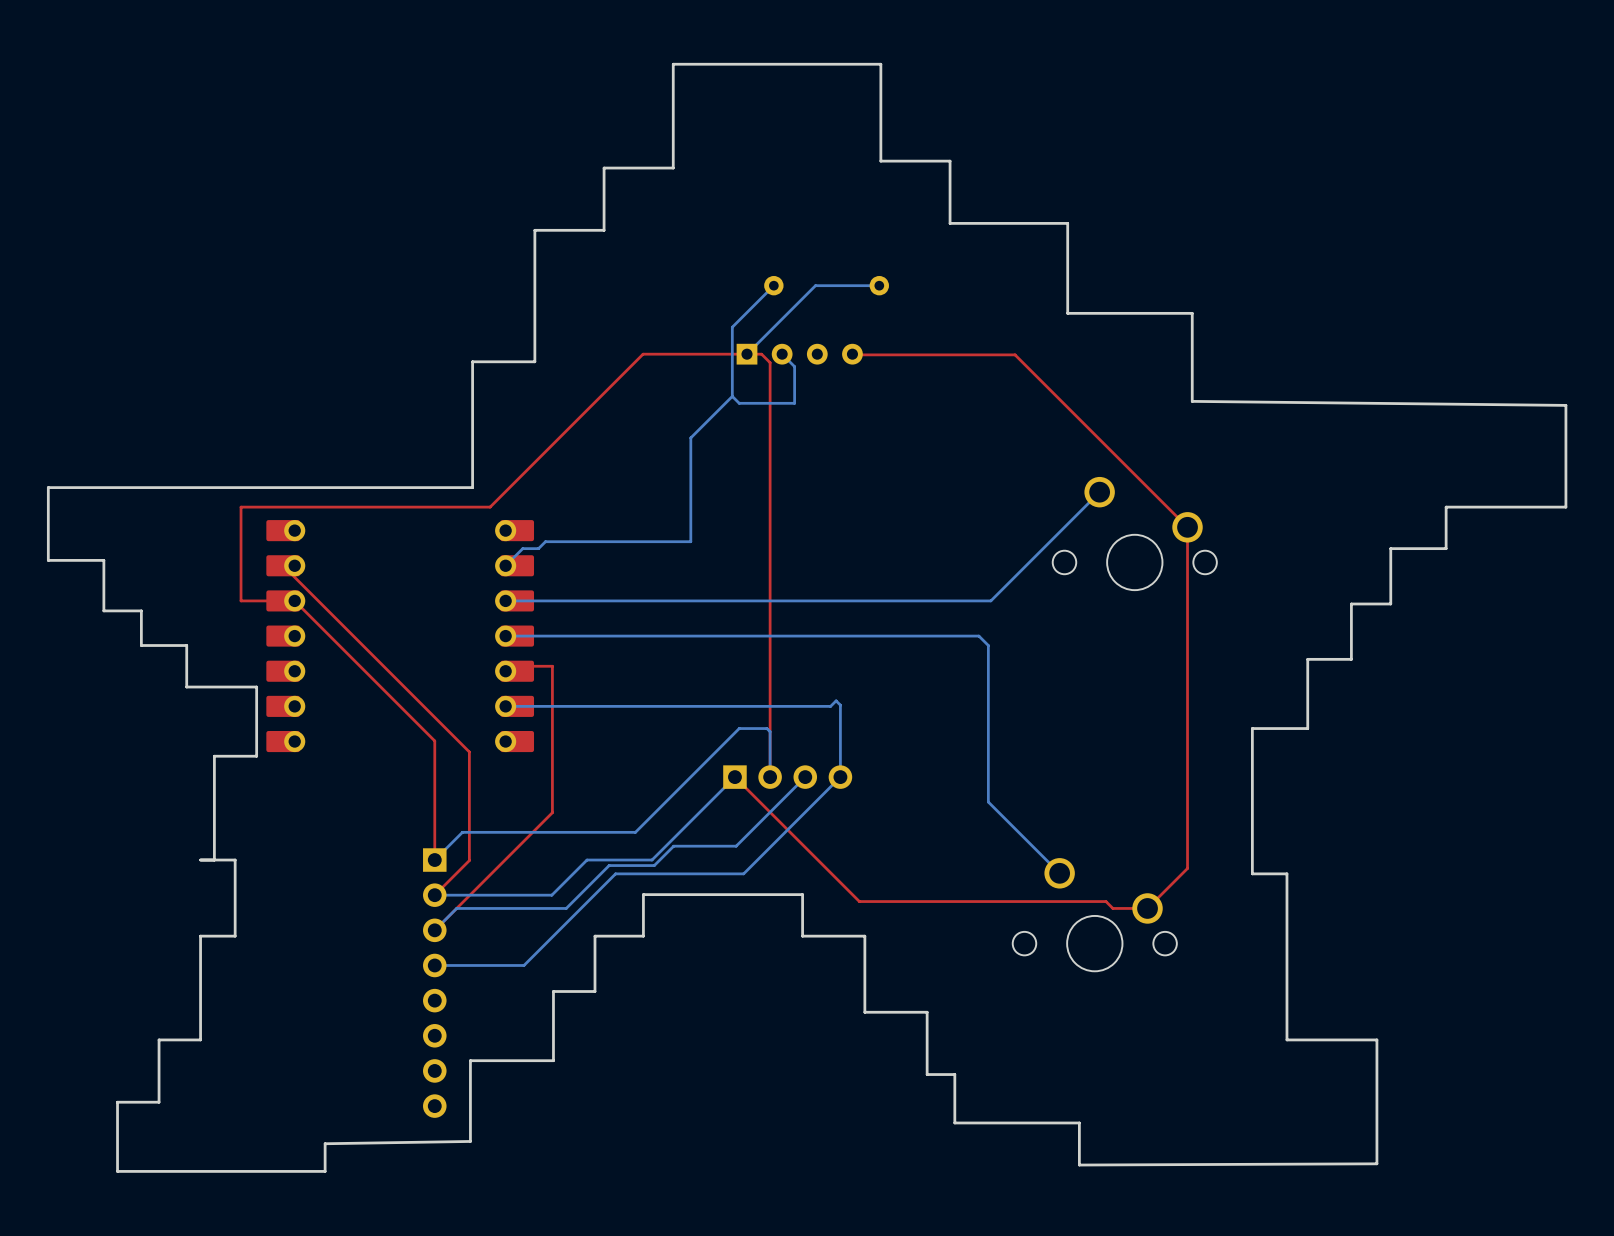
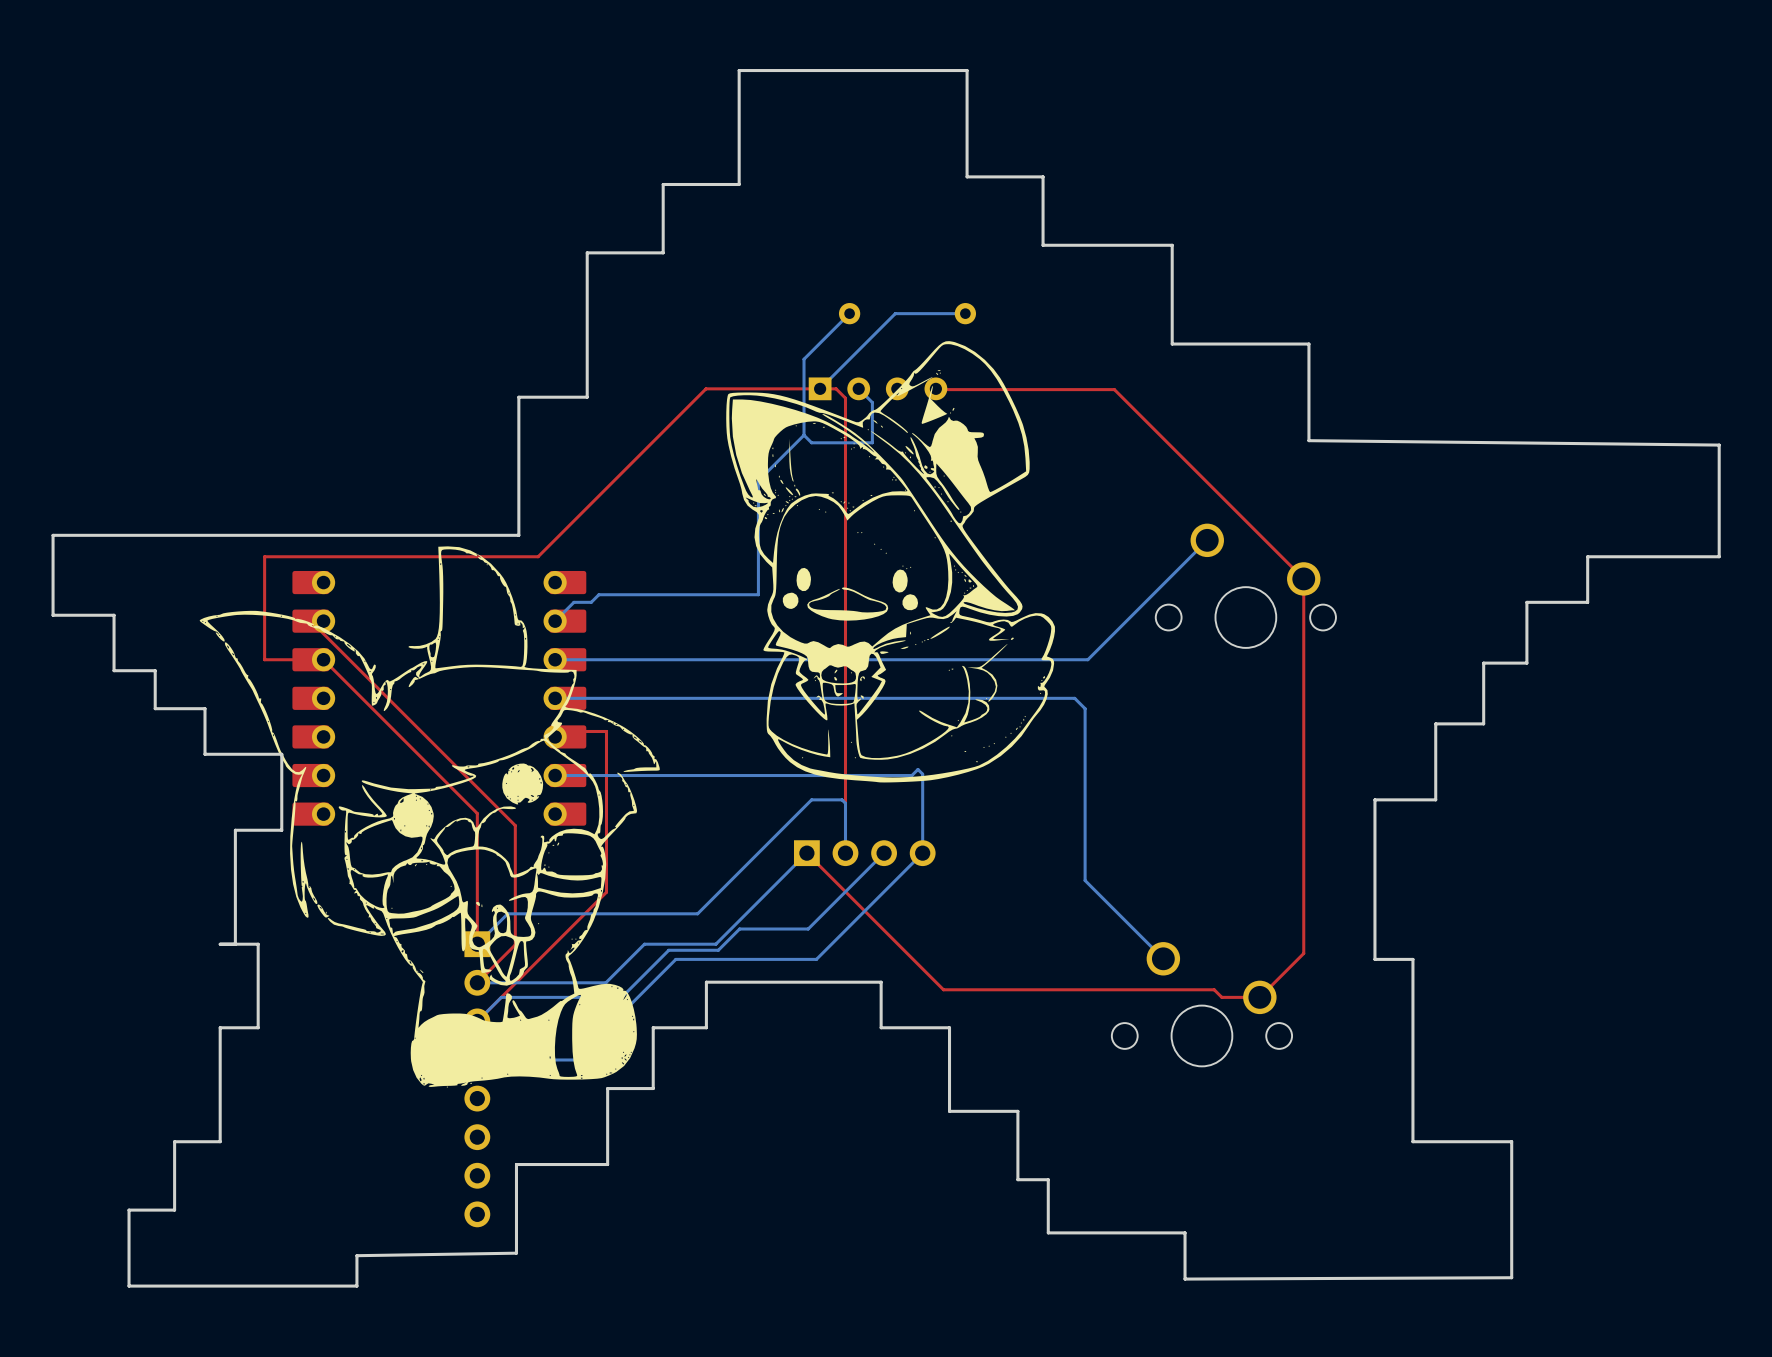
drawing: none -> [726, 341, 1055, 783]
drawing: none -> [199, 546, 660, 1088]

